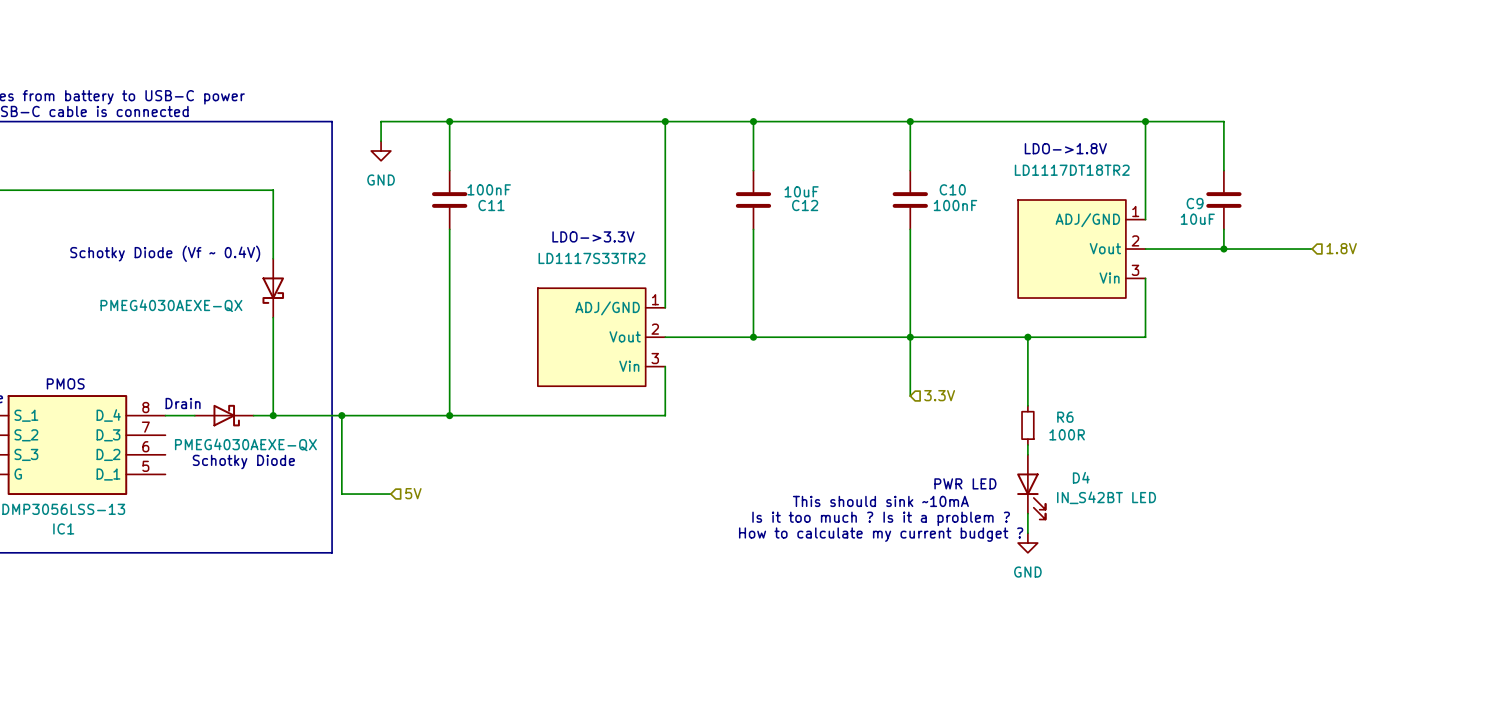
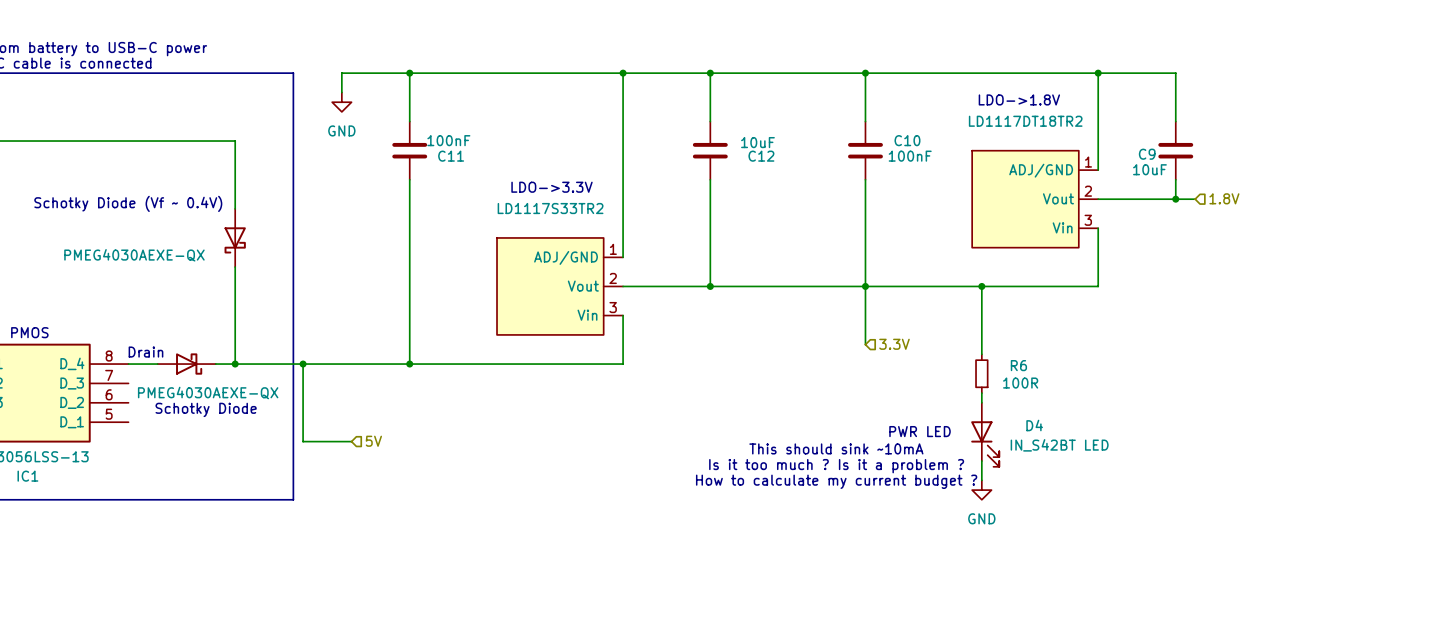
hierarchical label position: 1.8V (1341, 248) -> 1.8V (1224, 198)
wire: (1243, 249) (1312, 249) -> none

